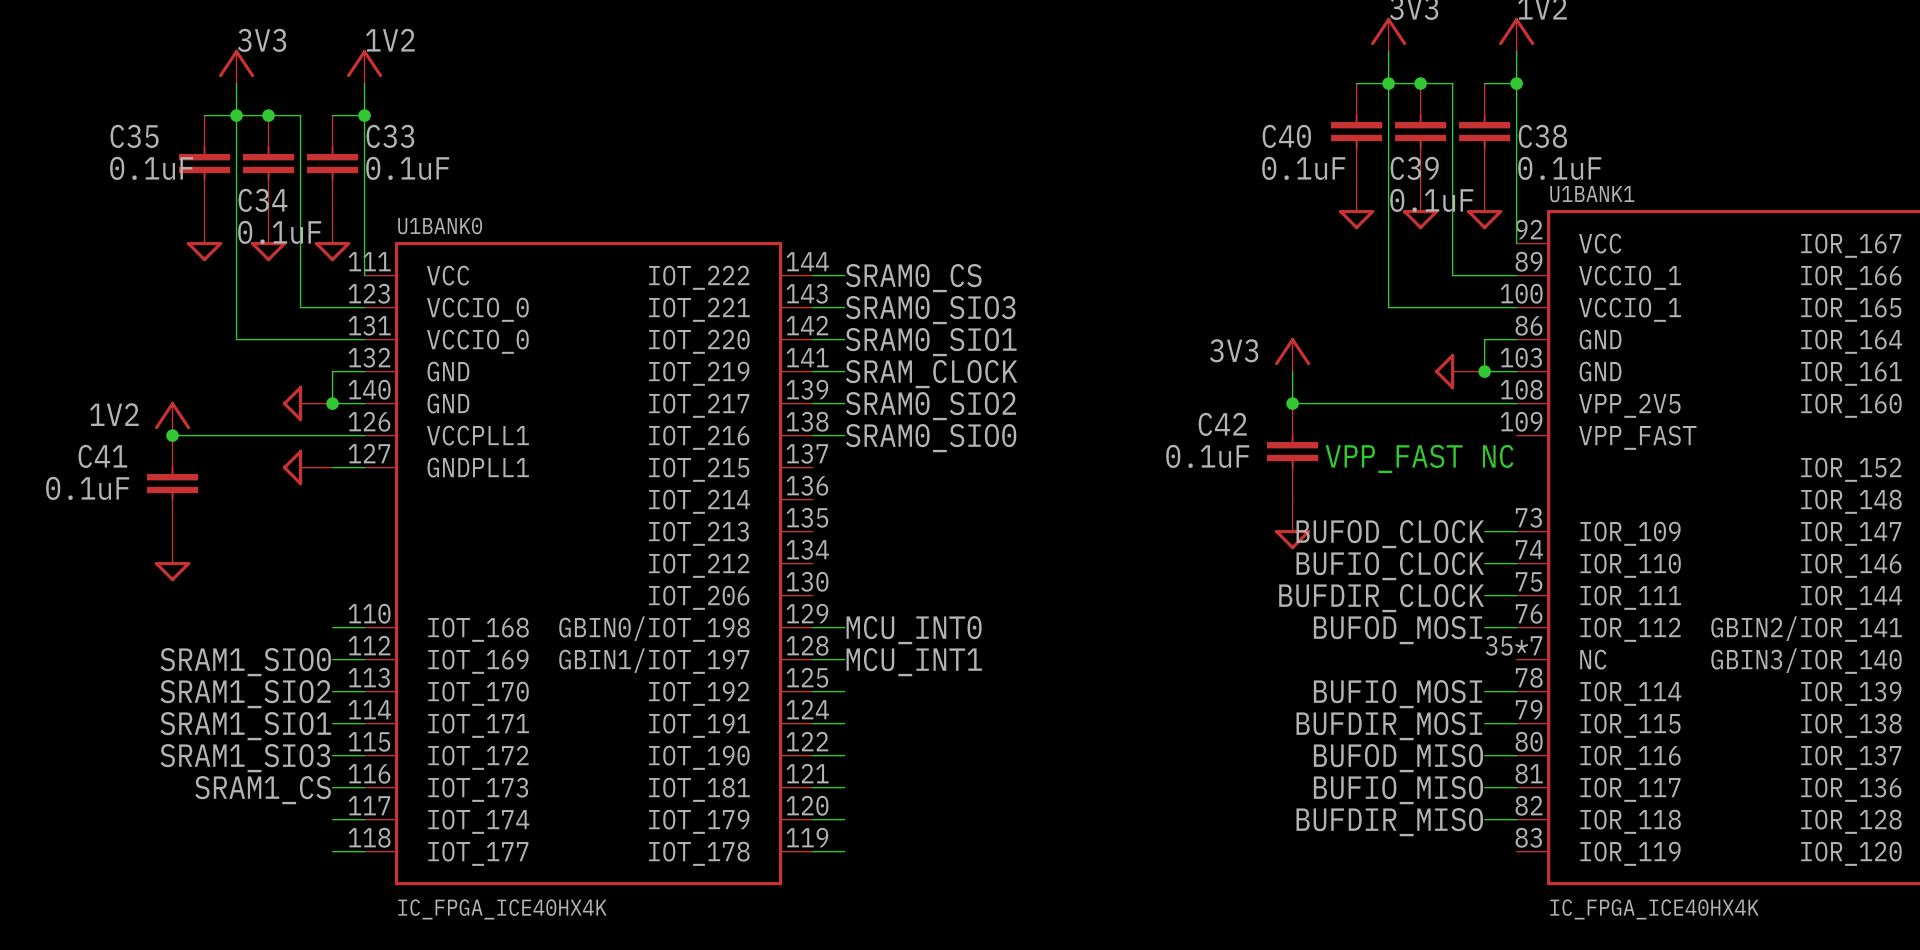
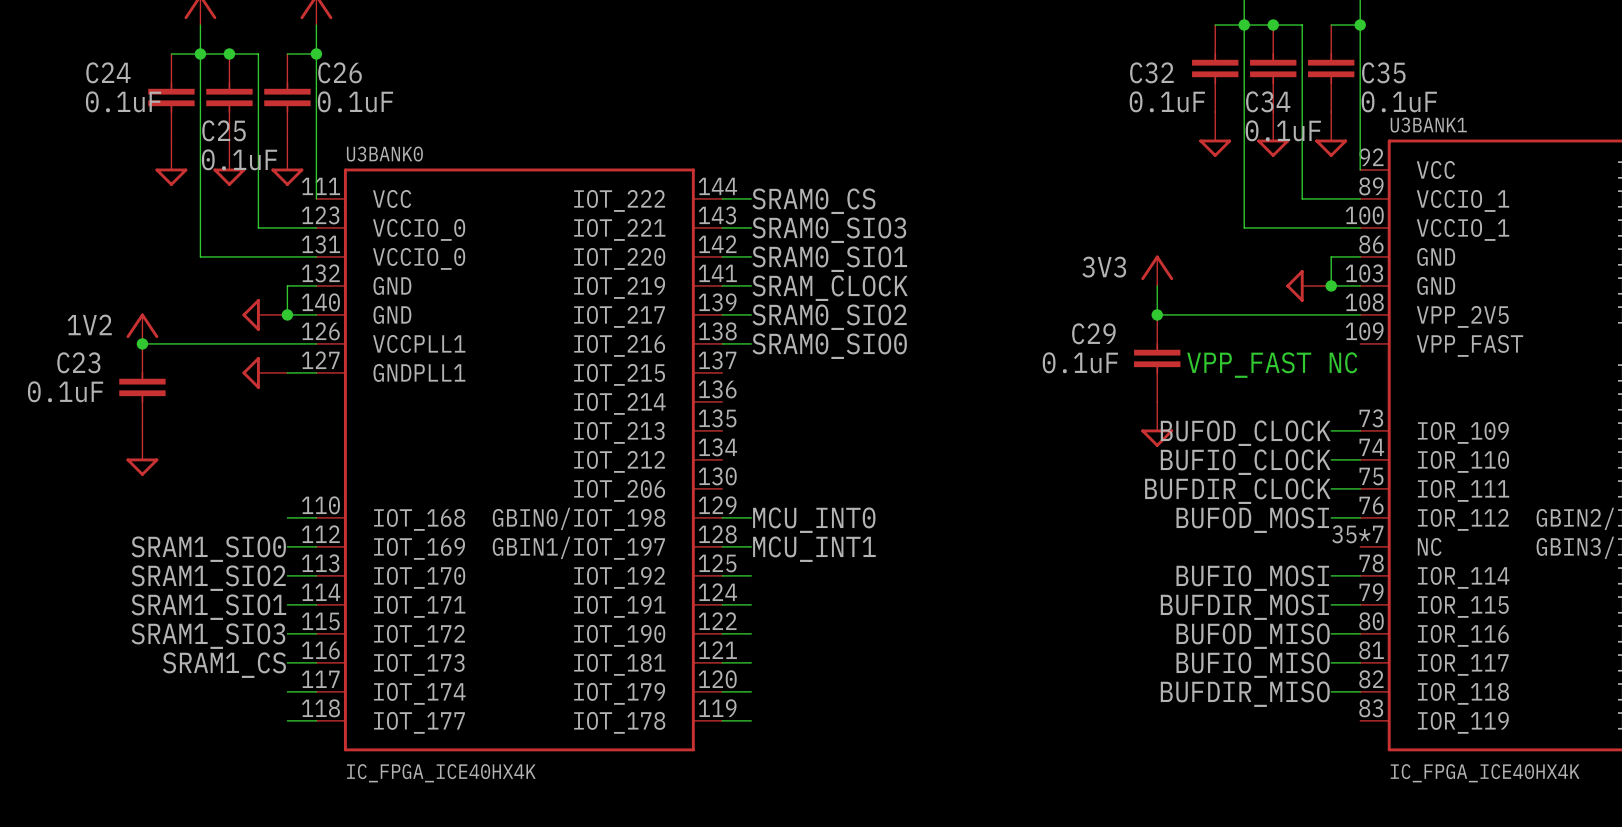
C35 name: C35 (134, 136) -> C24 (108, 72)
C33 name: C33 (390, 136) -> C26 (340, 72)
C40 name: C40 (1286, 136) -> C32 (1151, 72)
C38 name: C38 (1542, 136) -> C35 (1383, 72)
C39 name: C39 (1414, 168) -> C34 (1268, 101)
U1BANK1 name: U1BANK1 (1592, 194) -> U3BANK1 (1428, 125)
C34 name: C34 (263, 200) -> C25 (224, 130)
U1BANK0 name: U1BANK0 (440, 225) -> U3BANK0 (384, 154)
C42 name: C42 (1222, 424) -> C29 (1093, 333)
C41 name: C41 (102, 456) -> C23 (78, 362)

